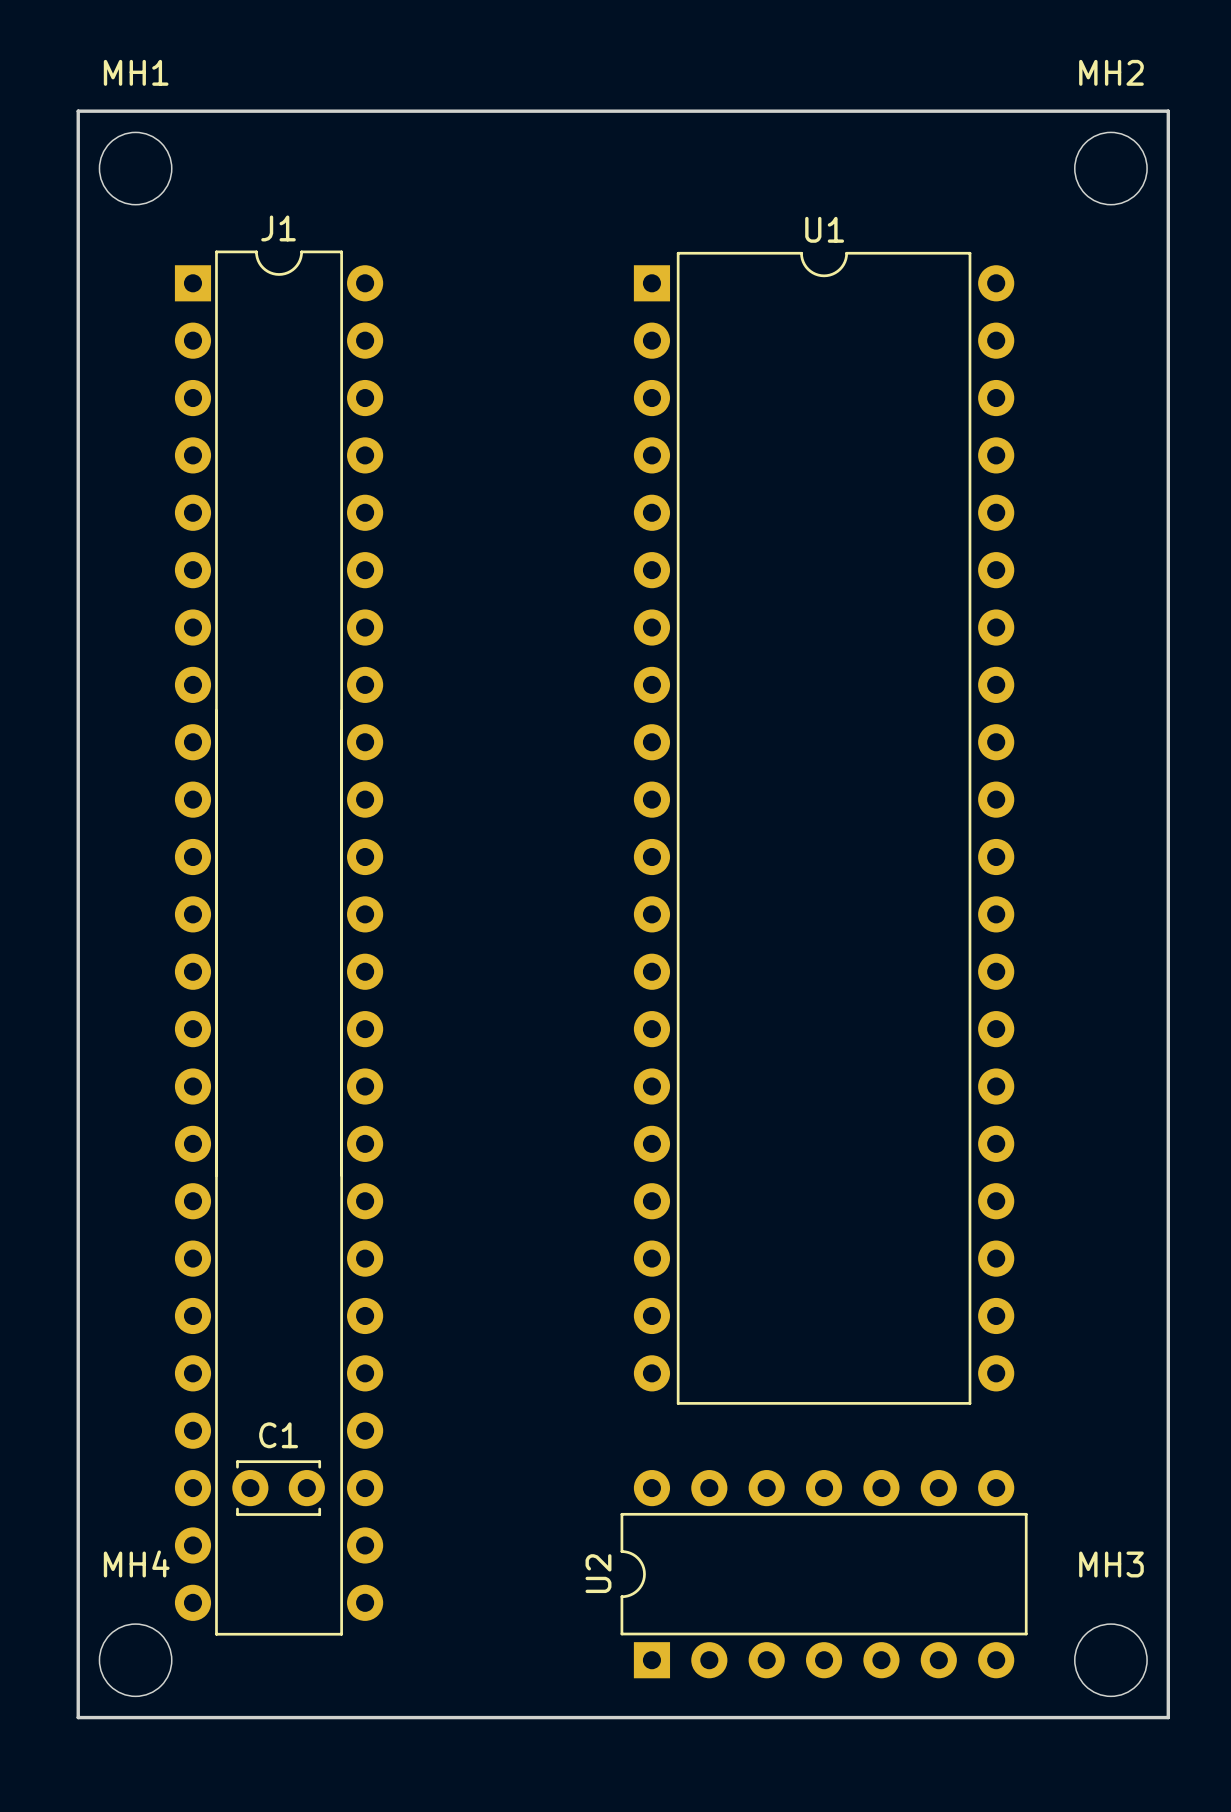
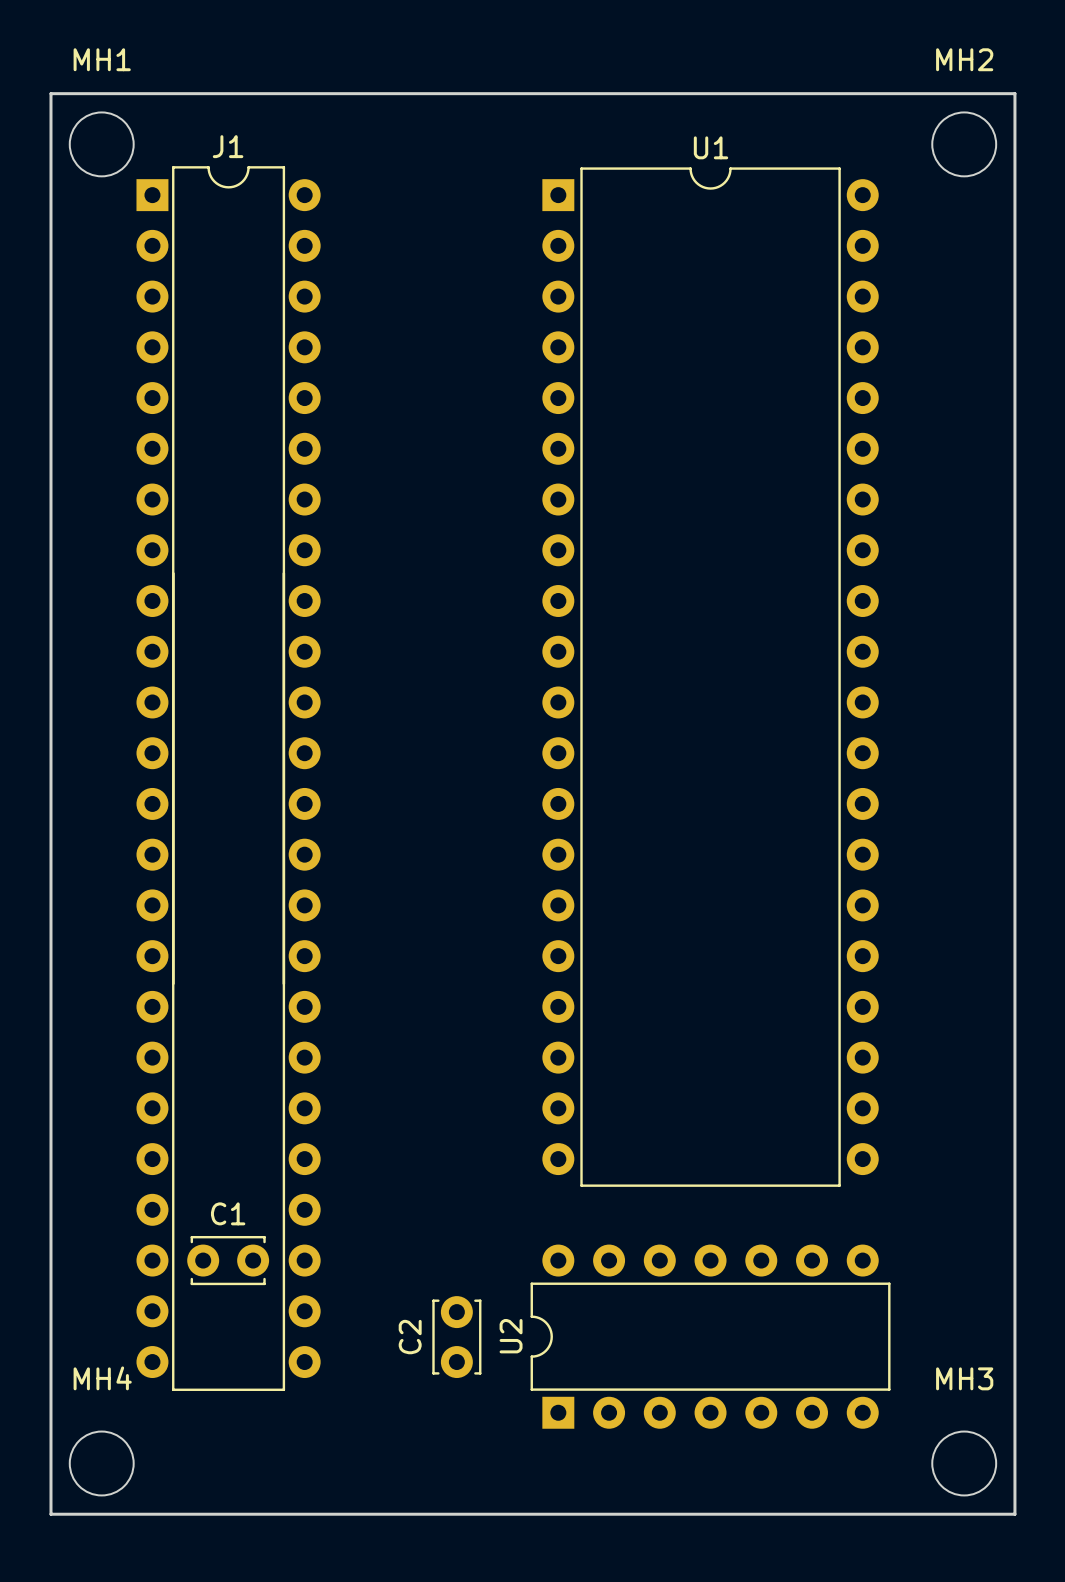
U1 position: (824, 828) -> (710, 677)
J1 position: (279, 943) -> (228, 778)
C1 position: (278, 1488) -> (228, 1260)
C2: none -> (456, 1337)
U2 position: (824, 1574) -> (710, 1336)

